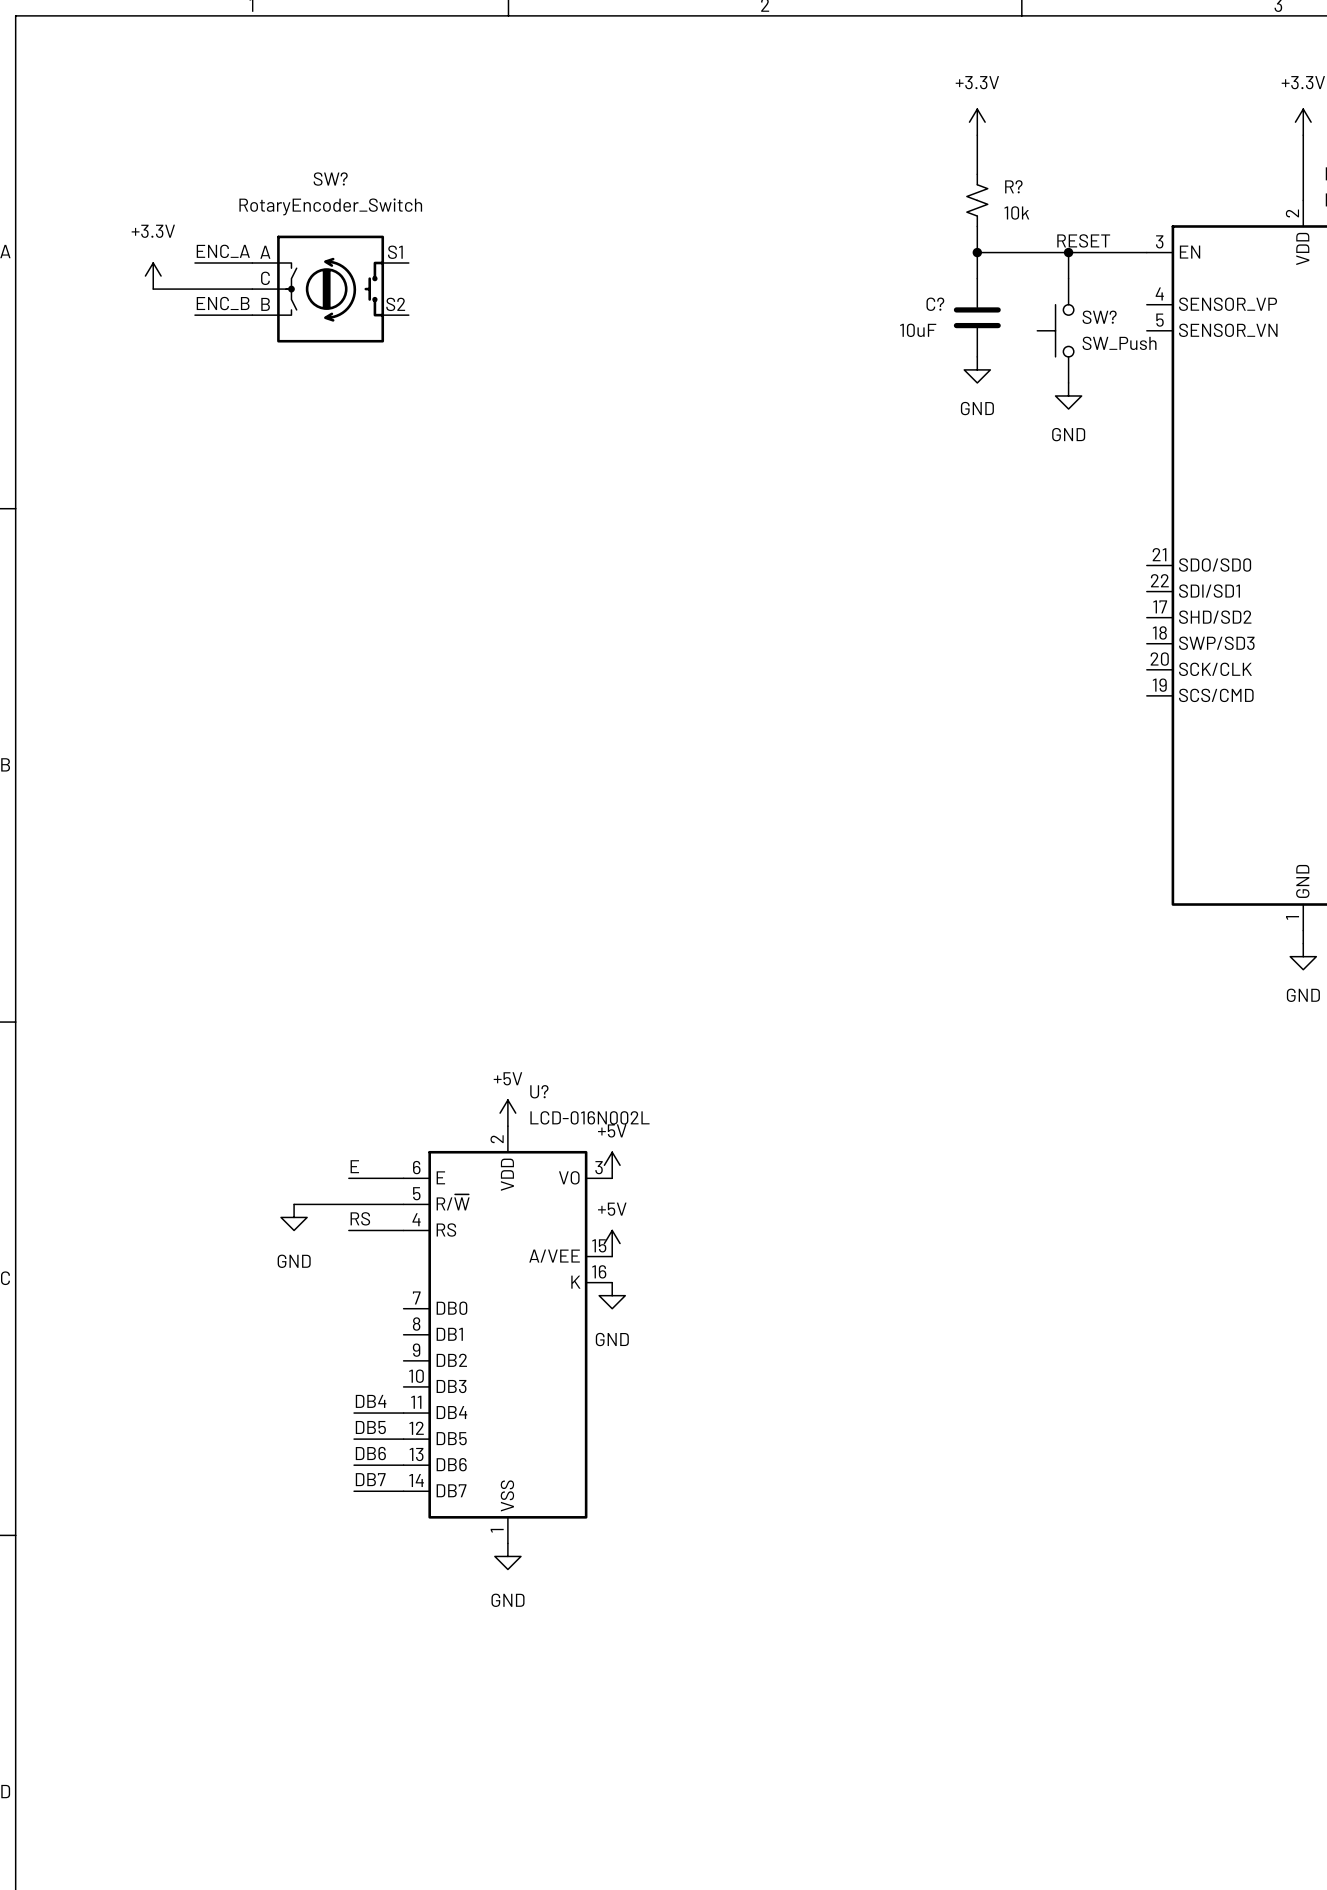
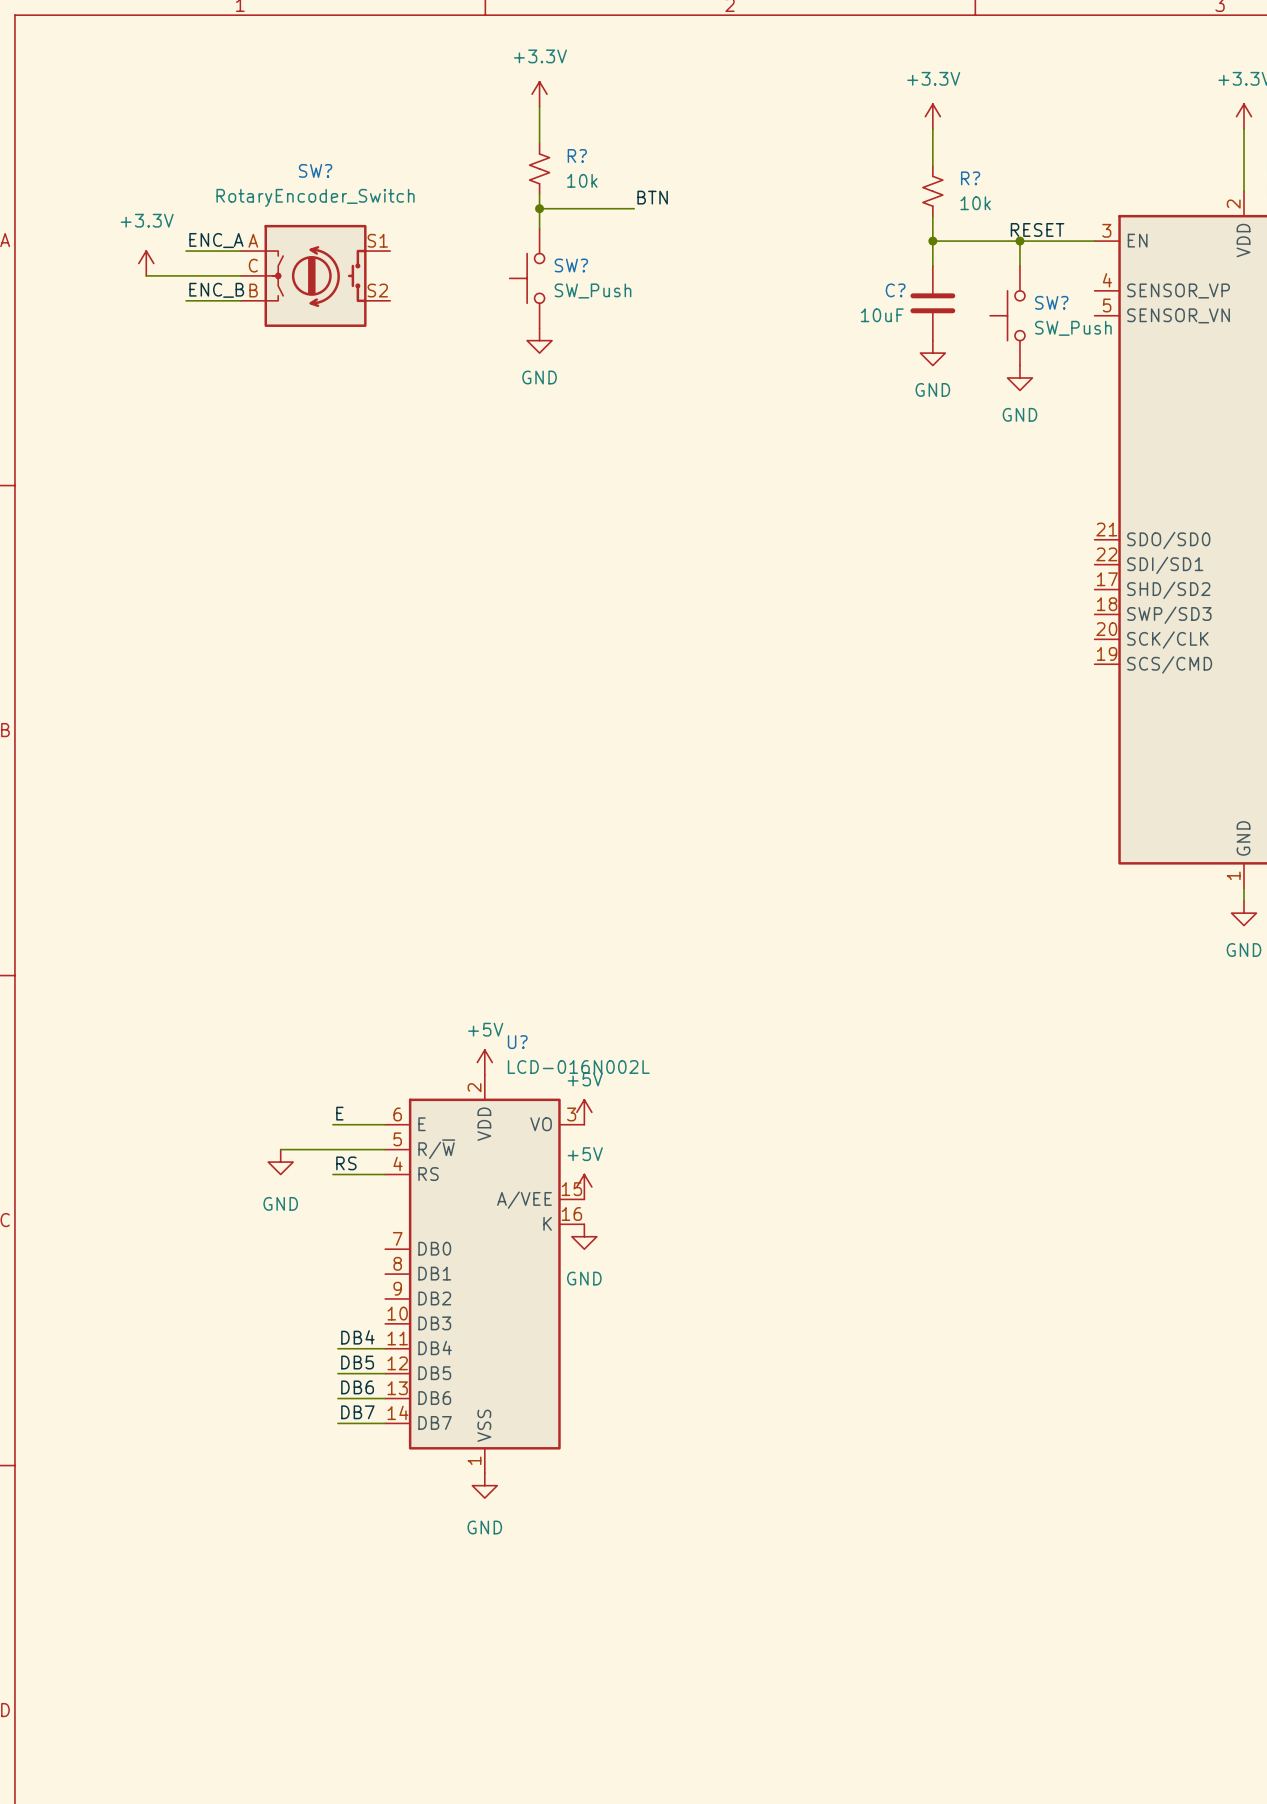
power symbol: none -> +3.3V (539, 94)
wire: none -> (539, 106) (539, 144)
R?: none -> 10k (539, 168)
wire: none -> (539, 193) (539, 228)
label: none -> BTN (652, 197)
wire: none -> (539, 208) (634, 208)
junction: none -> (539, 208)
SW?: none -> SW_Push (527, 278)
power symbol: none -> GND (539, 340)

